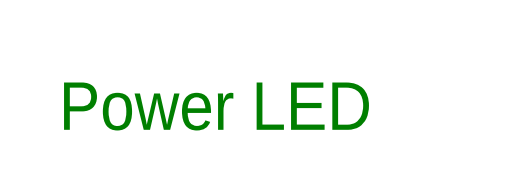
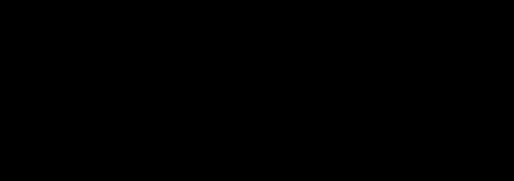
text: Power LED (216, 106) -> none

